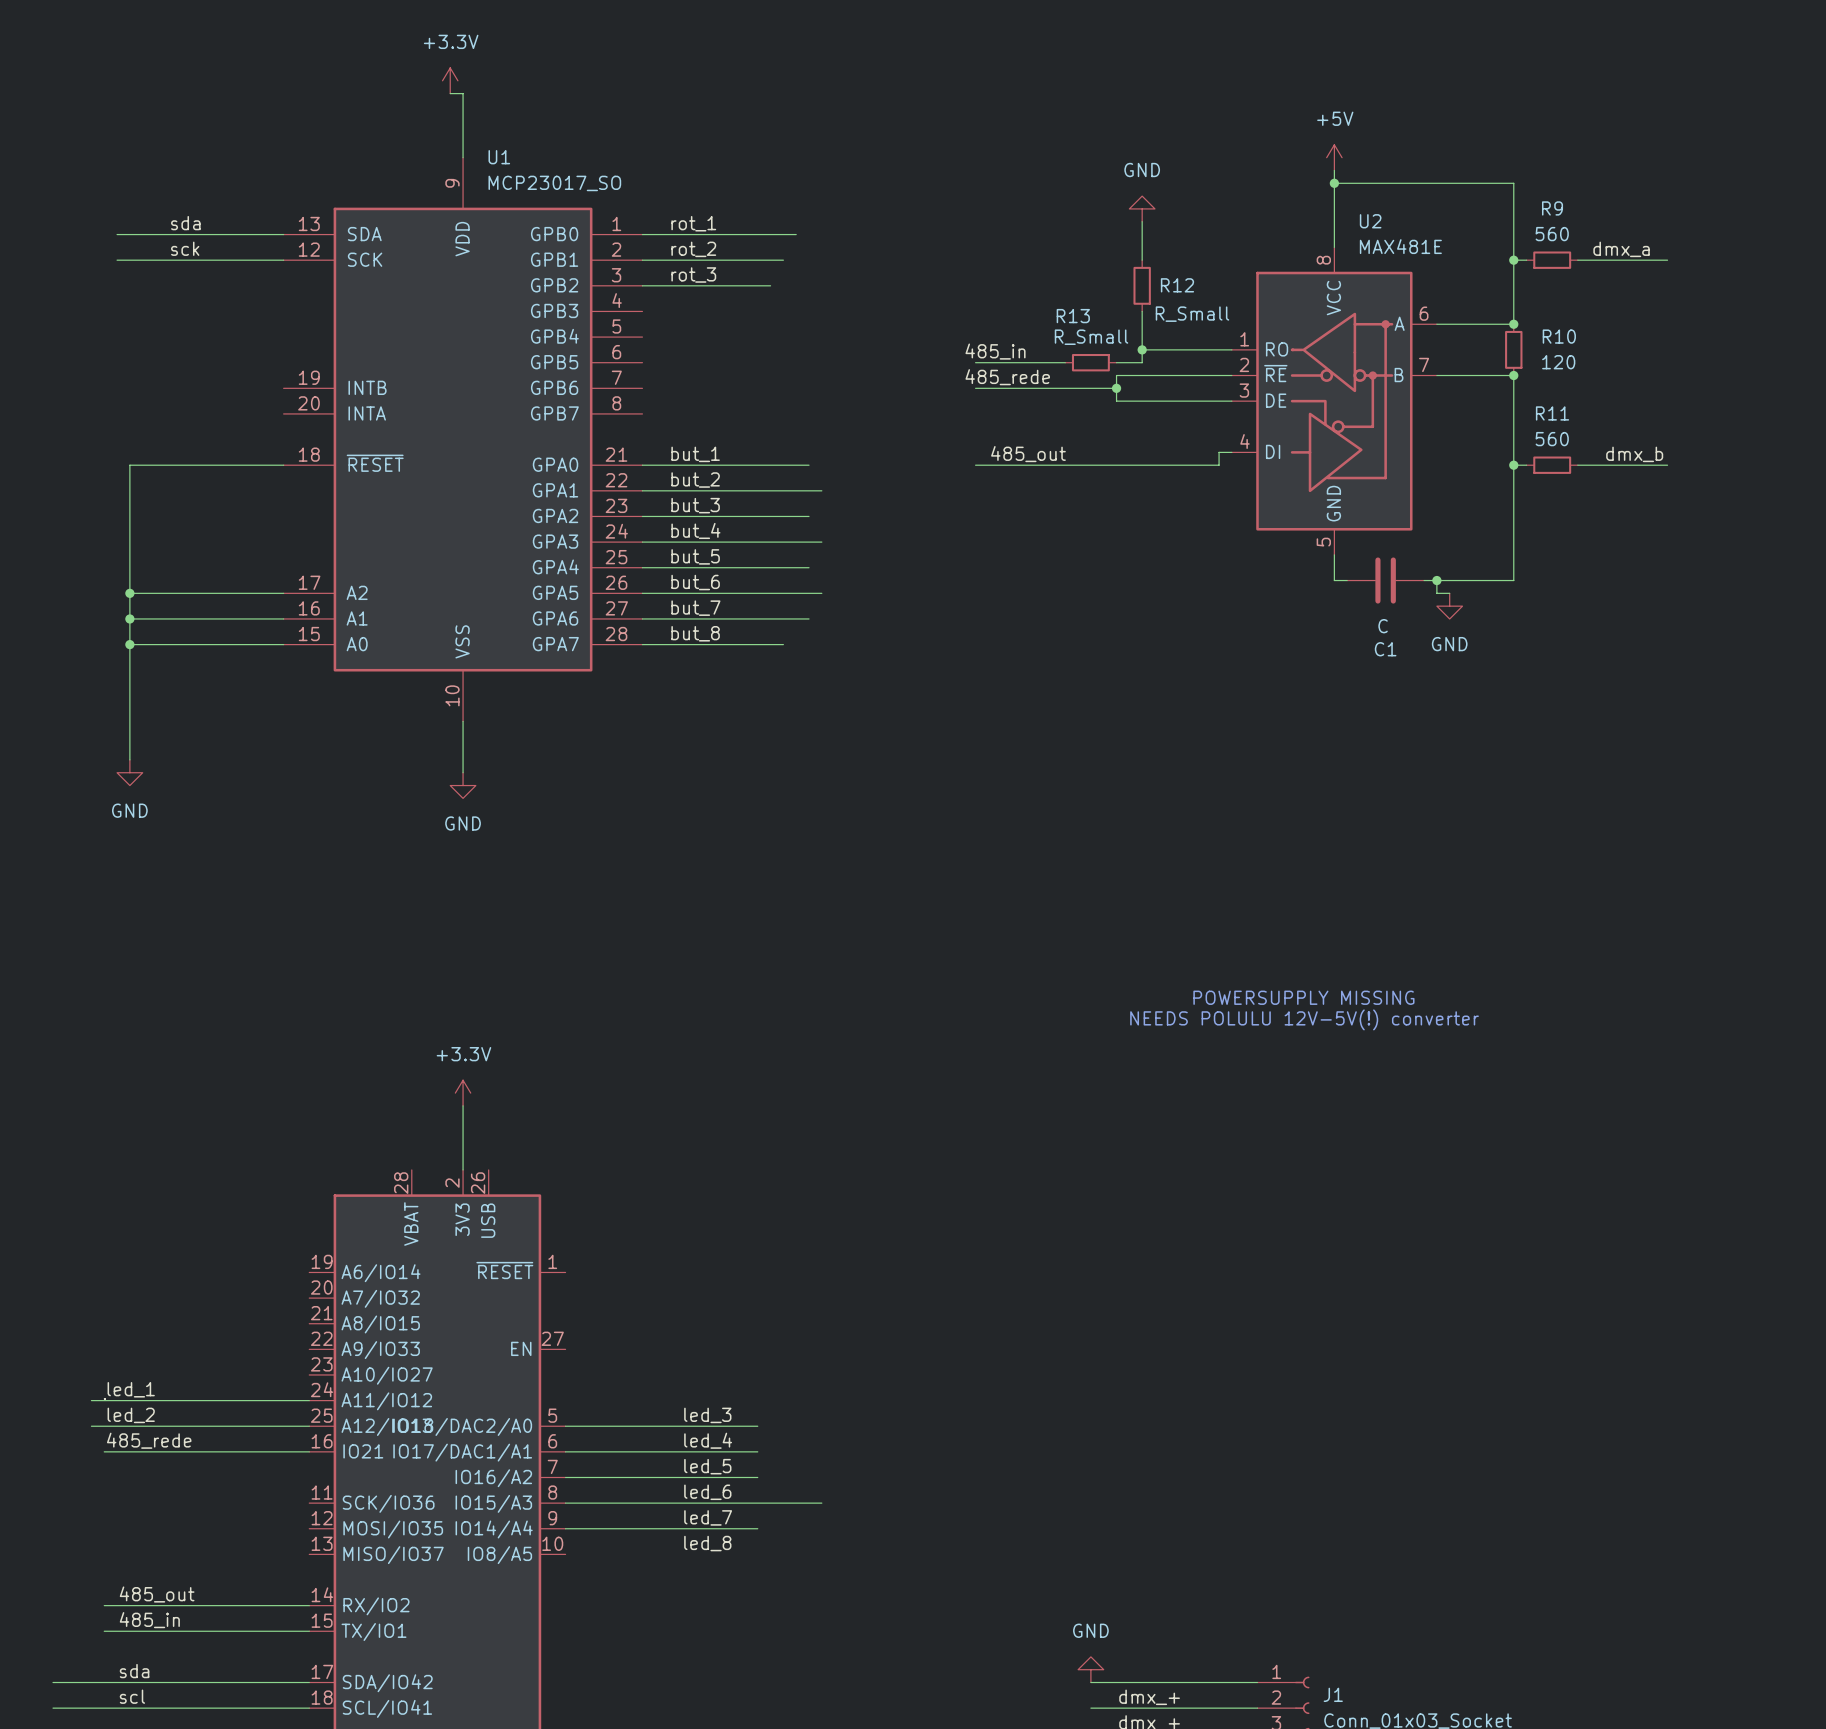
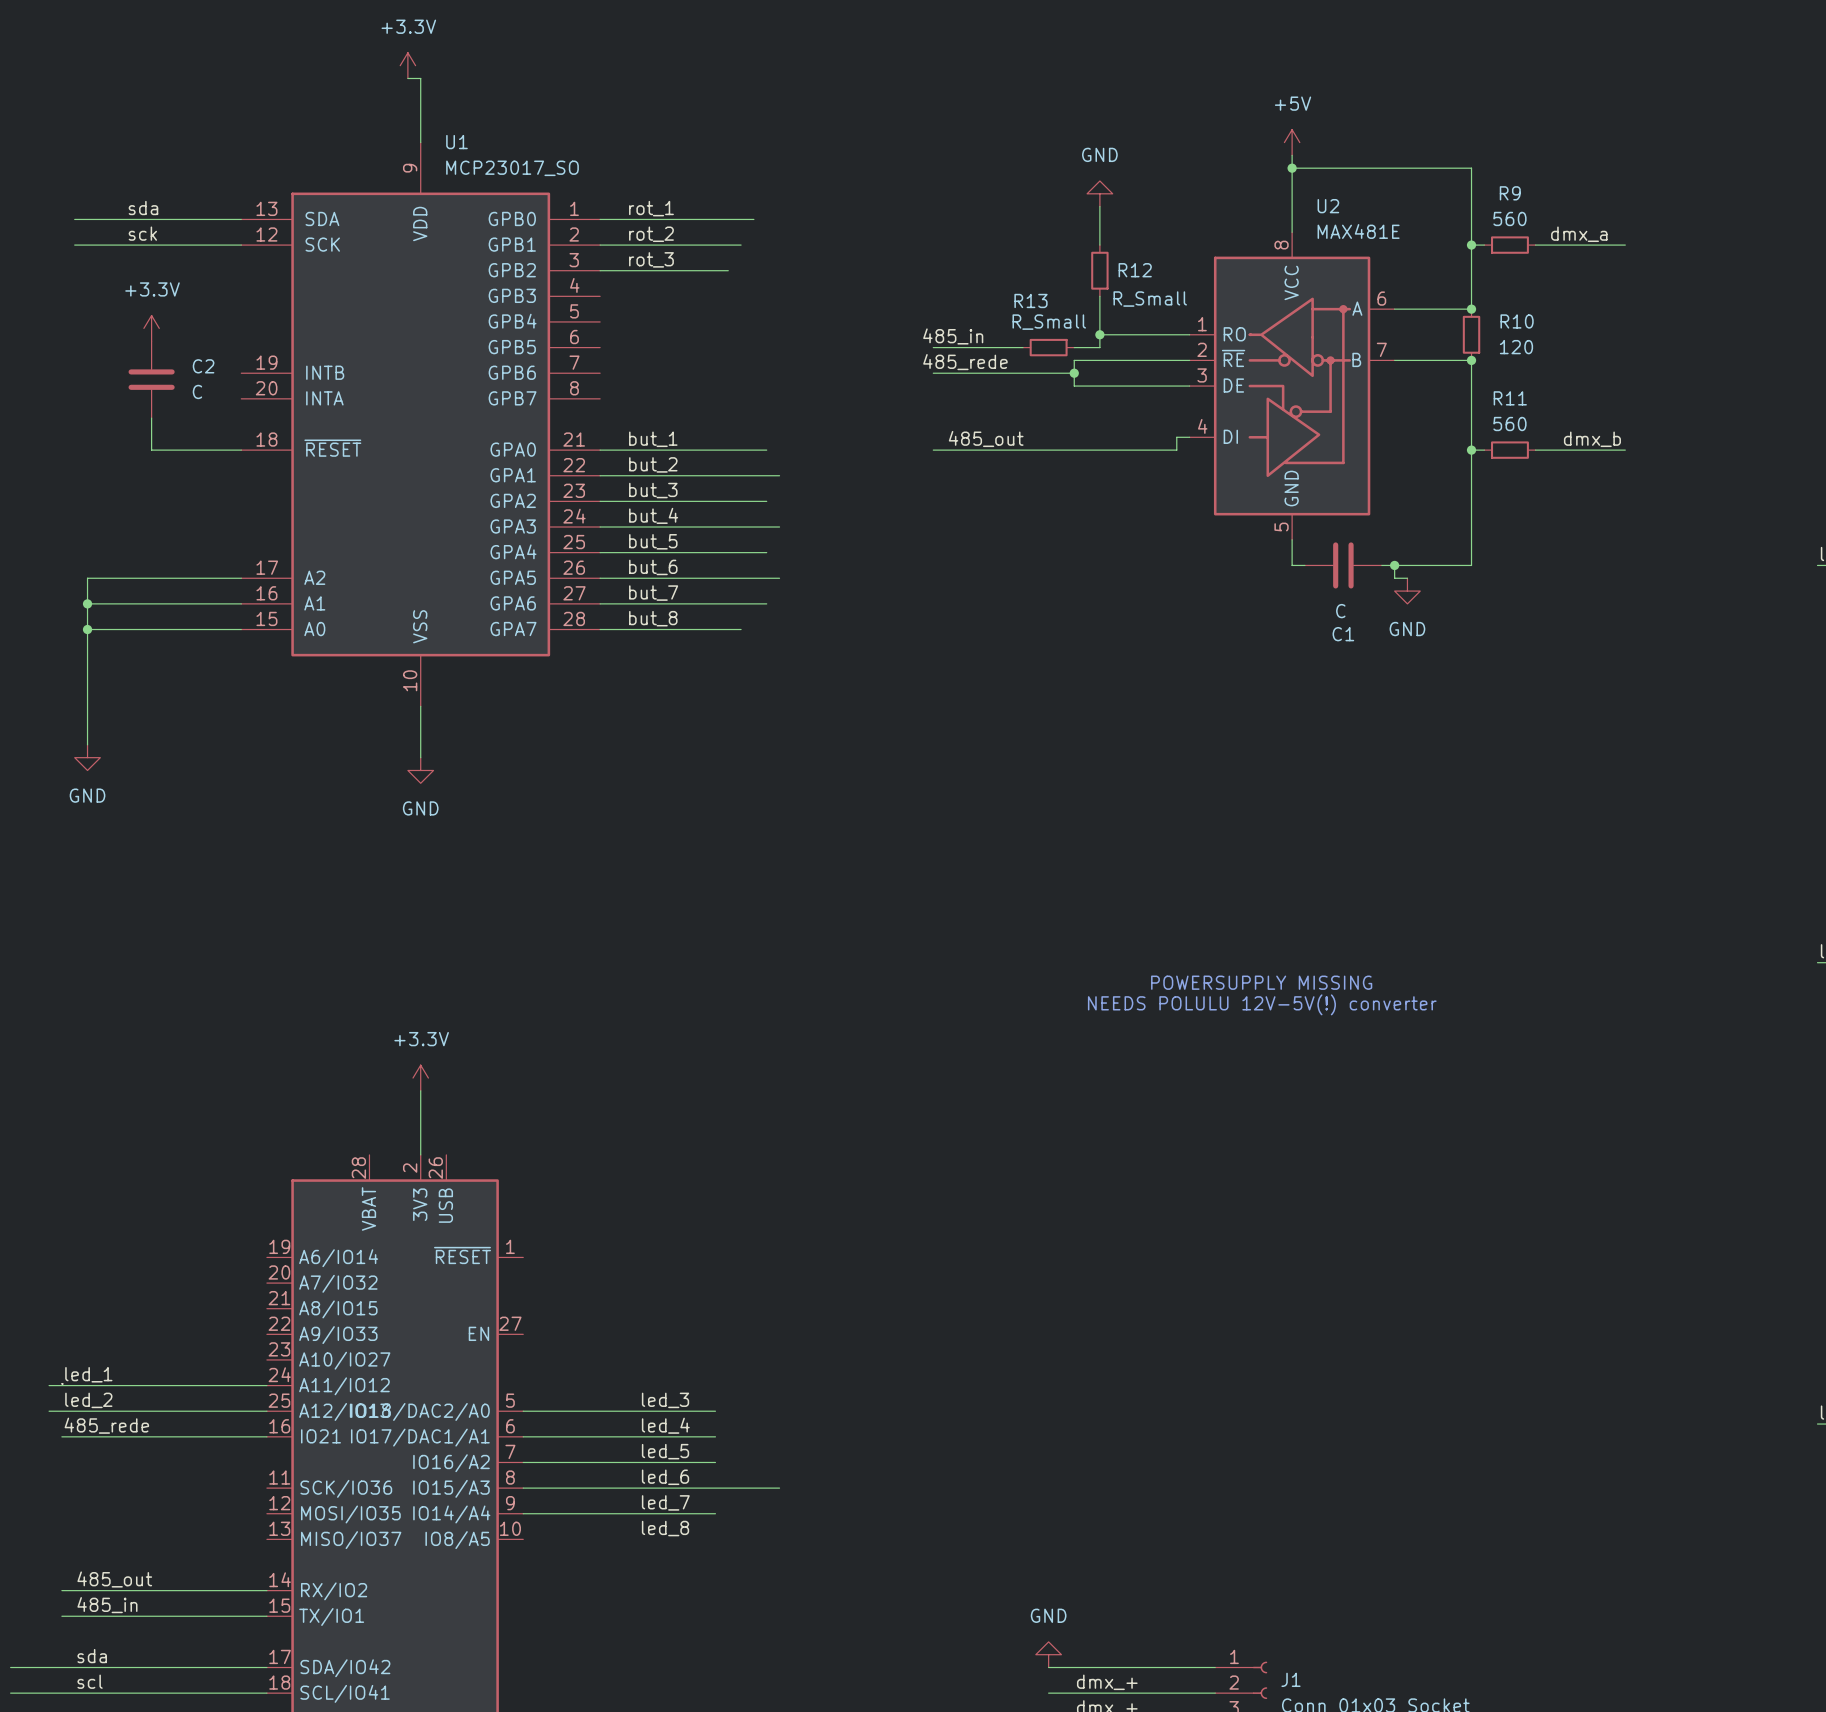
power symbol: none -> +3.3V (151, 328)
C2: none -> C (151, 379)
wire: (193, 465) (129, 465) (129, 593) -> (151, 450) (151, 418)
junction: (129, 593) -> none

